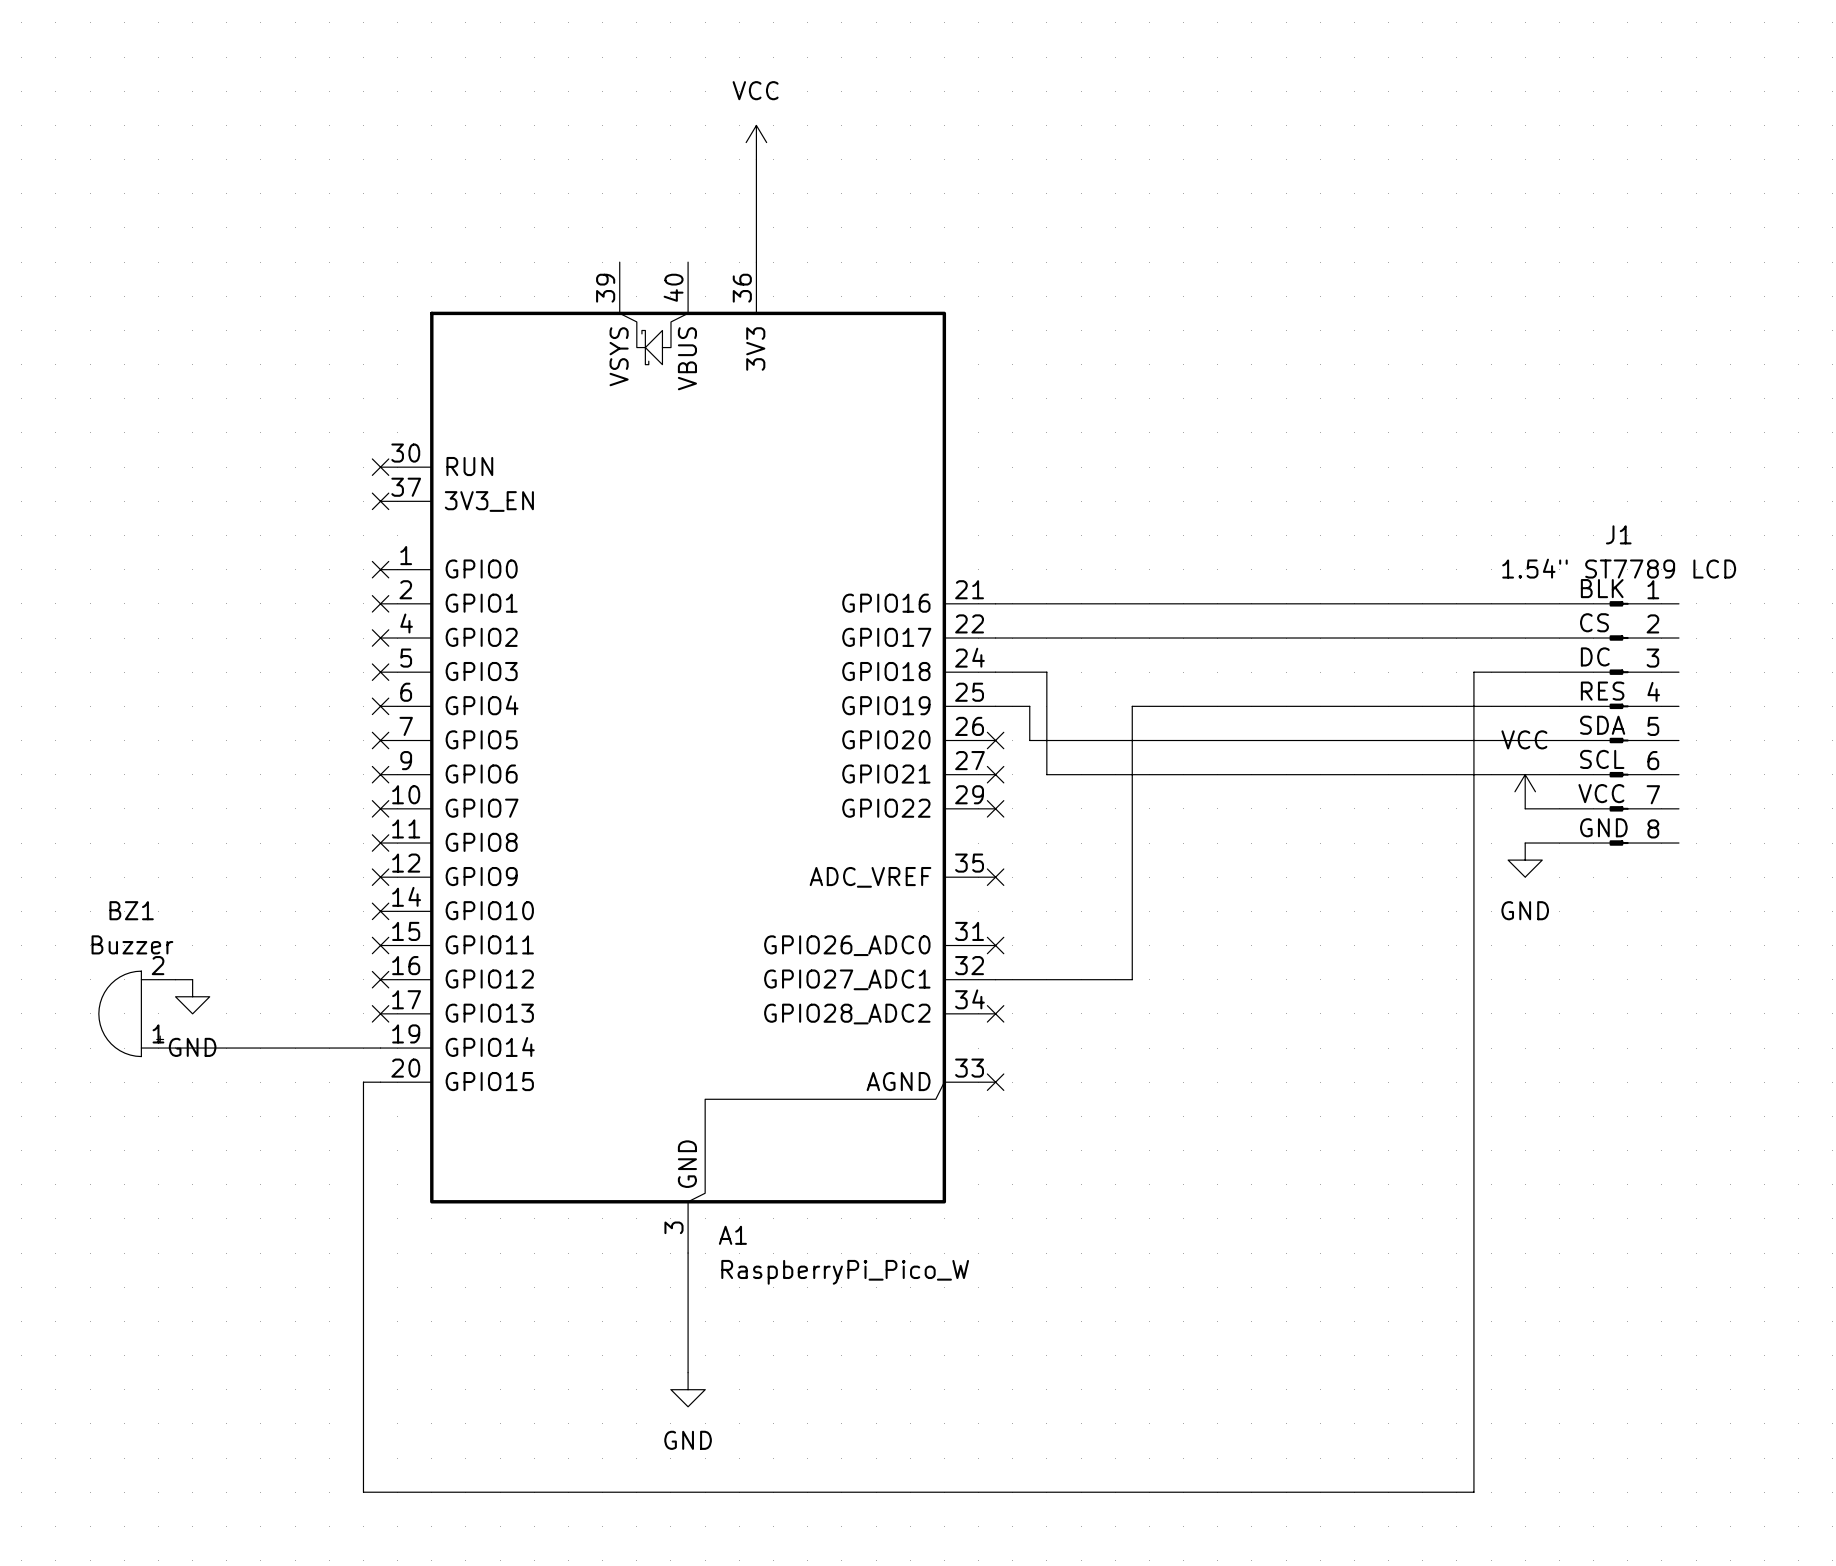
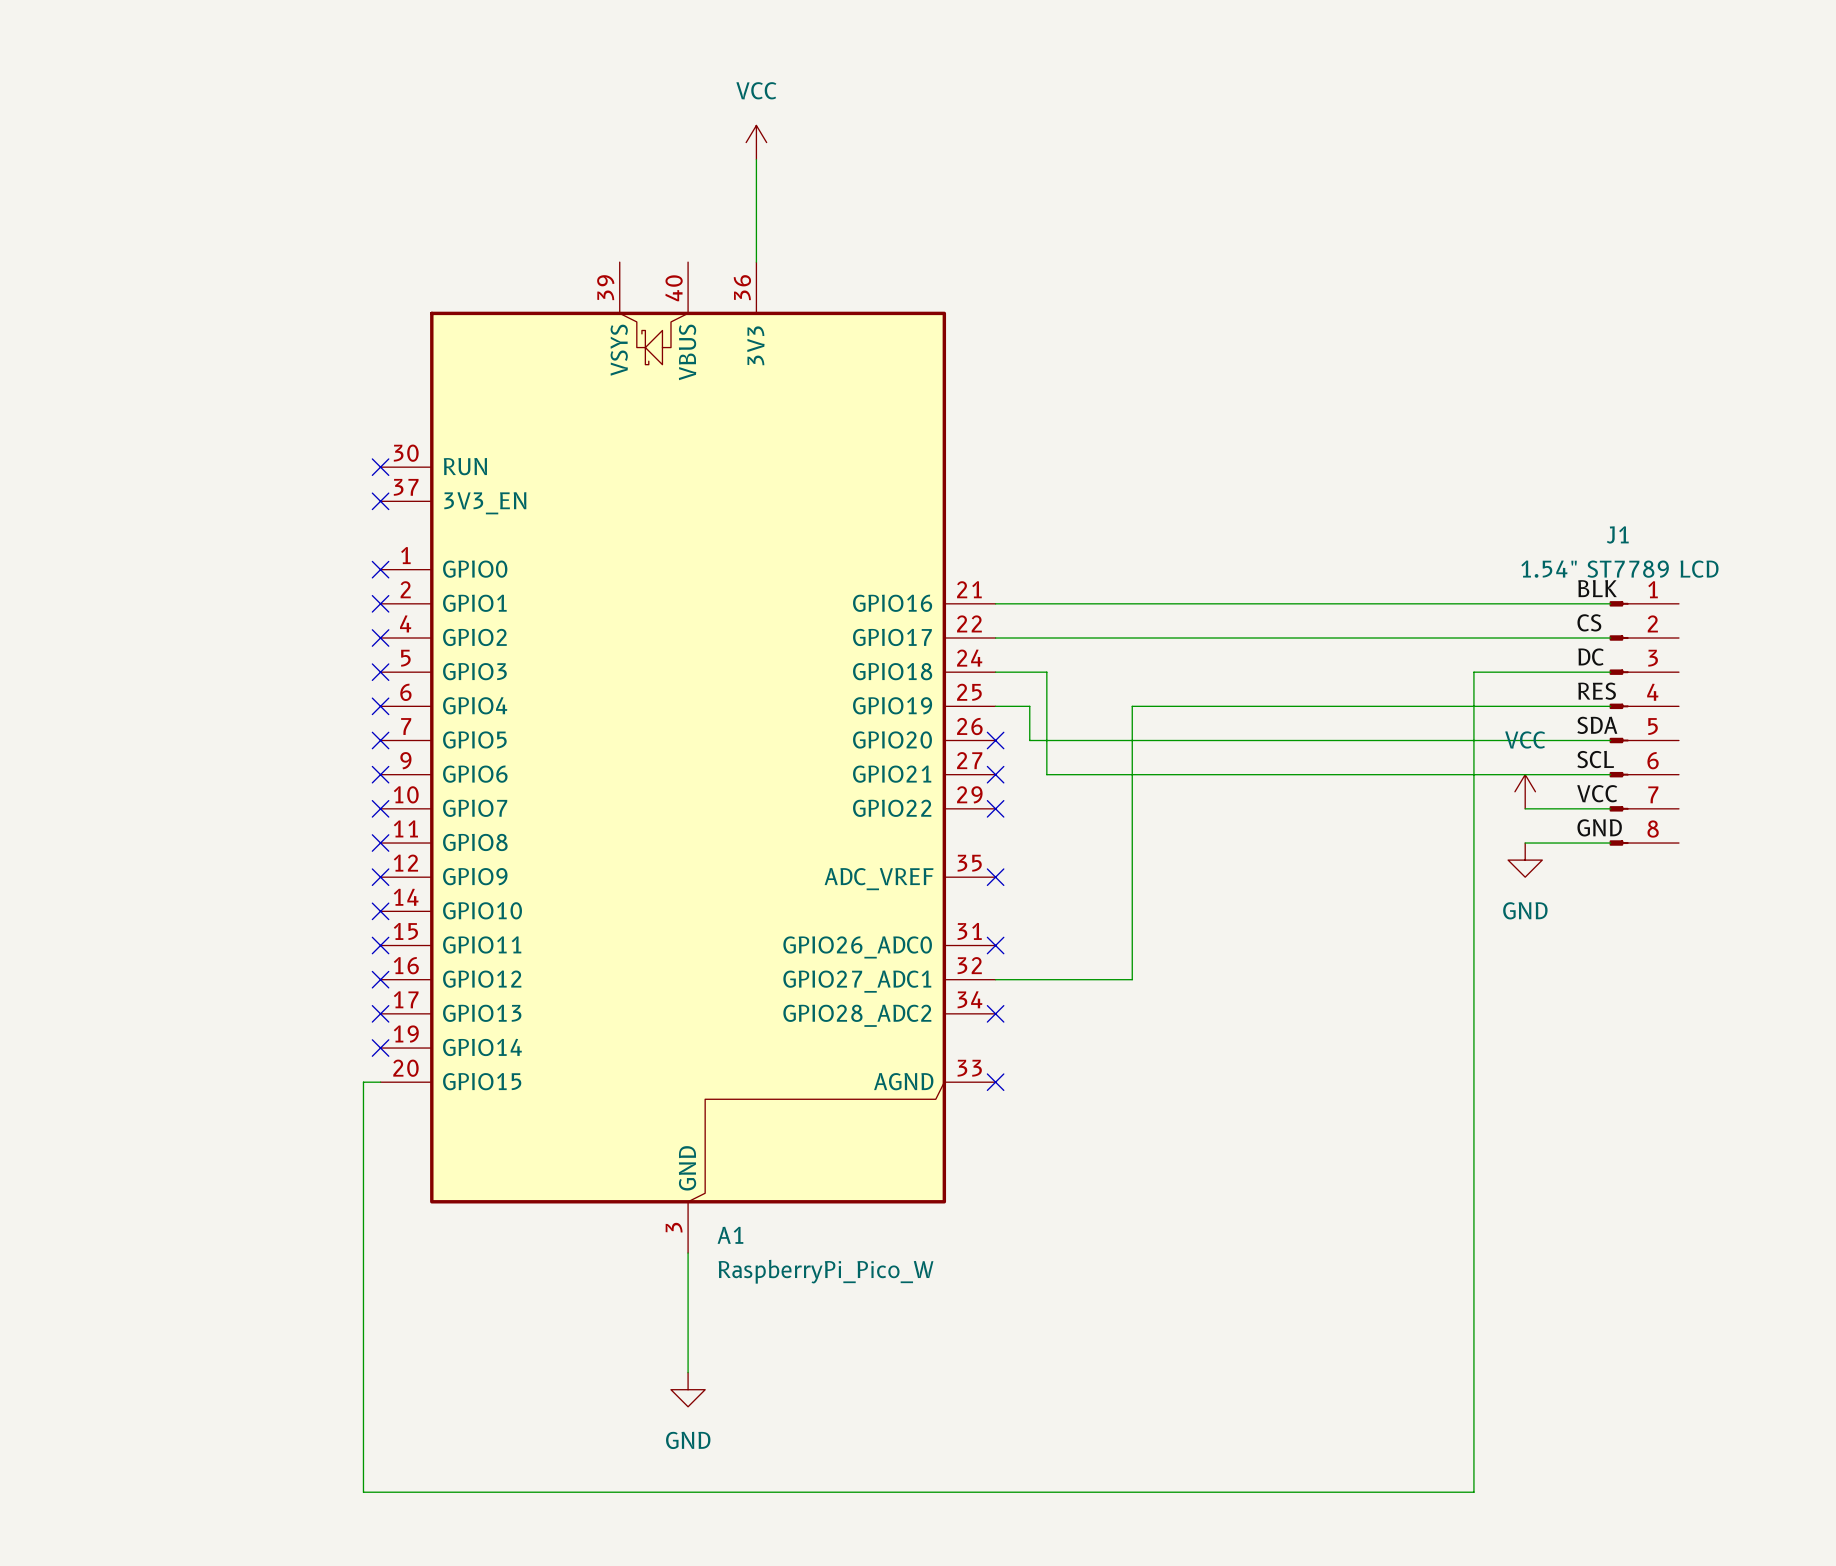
wire: (175, 979) (192, 979) -> none
power symbol: GND (192, 996) -> none
BZ1: Buzzer (137, 1013) -> none
wire: (175, 1048) (380, 1048) -> none
no-connect mark: none -> (380, 1048)

